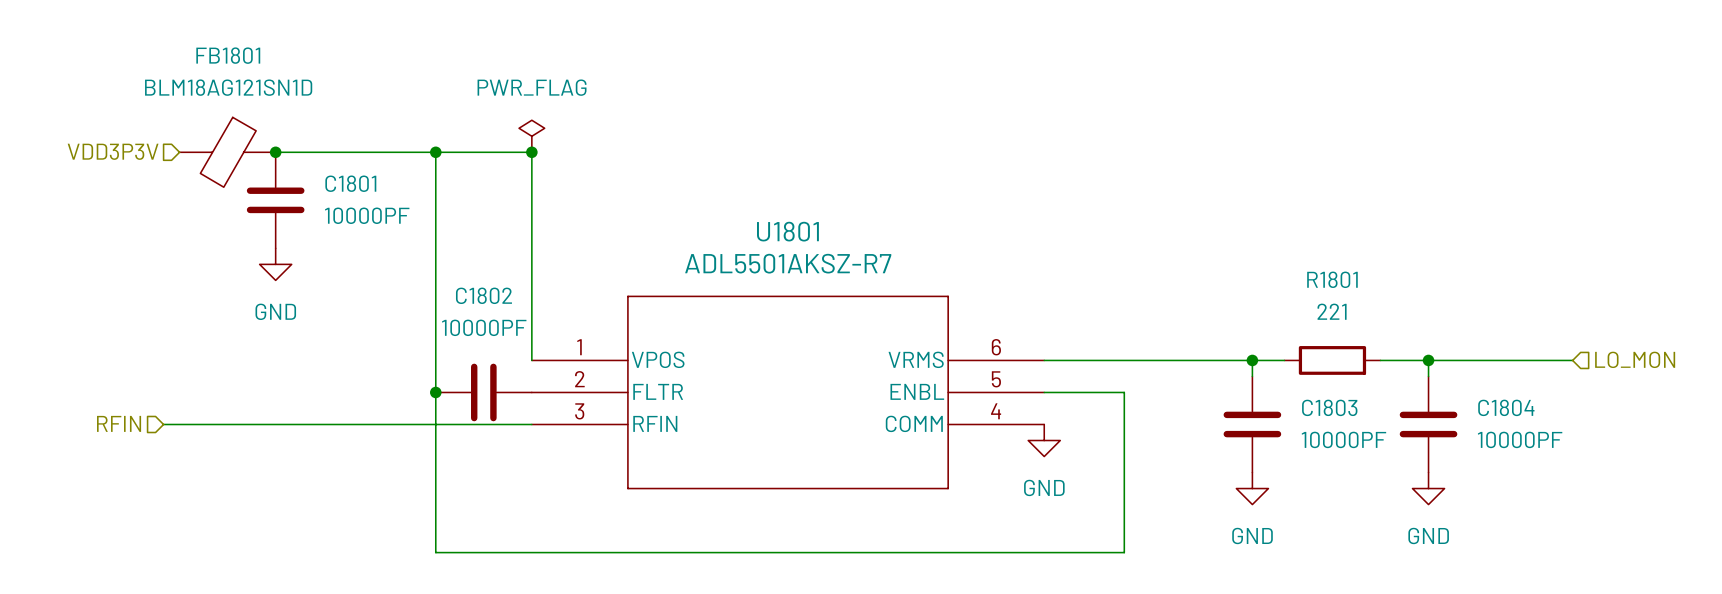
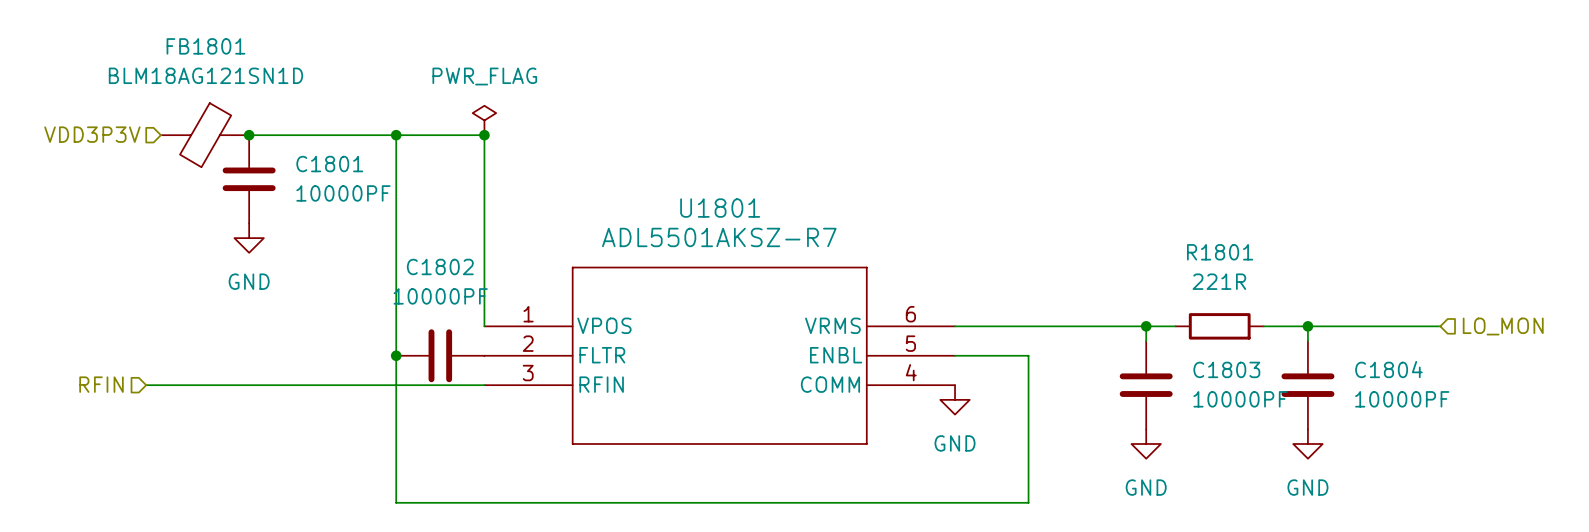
R1801 value: 221 (1332, 311) -> 221R (1219, 281)

